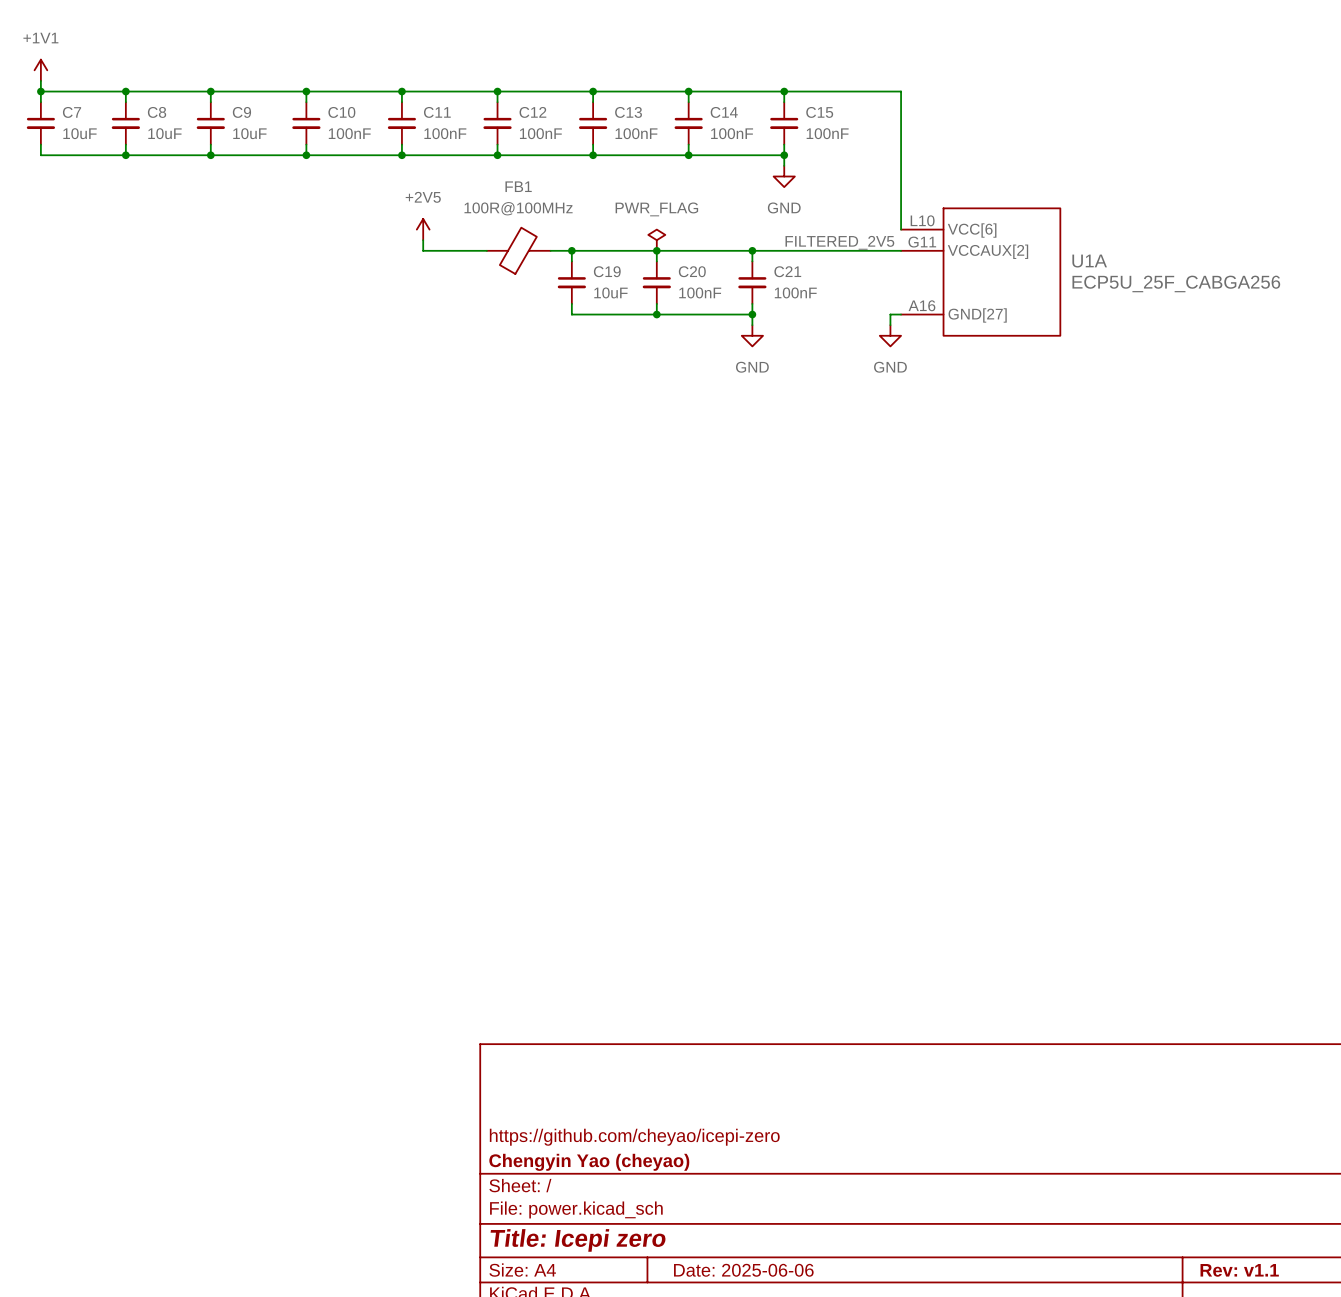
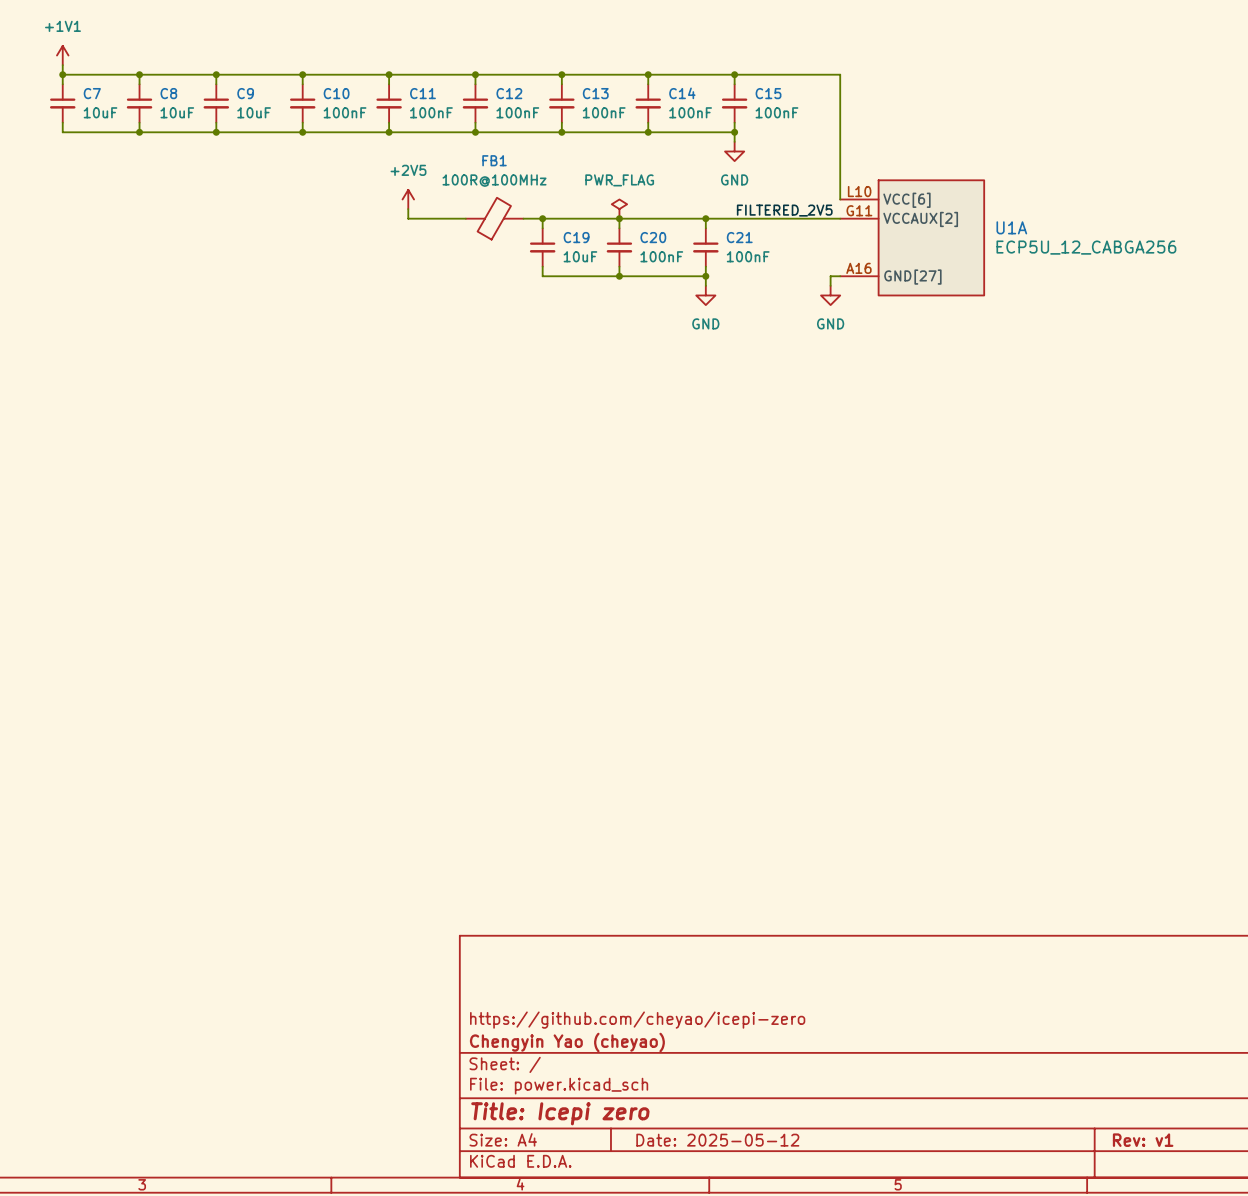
U1A value: ECP5U_25F_CABGA256 (1176, 283) -> ECP5U_12_CABGA256 (1086, 247)
title block: Date: 2025-06-06 (743, 1270) -> Date: 2025-05-12 (717, 1140)
title block: Rev: v1.1 (1239, 1270) -> Rev: v1 (1143, 1140)

